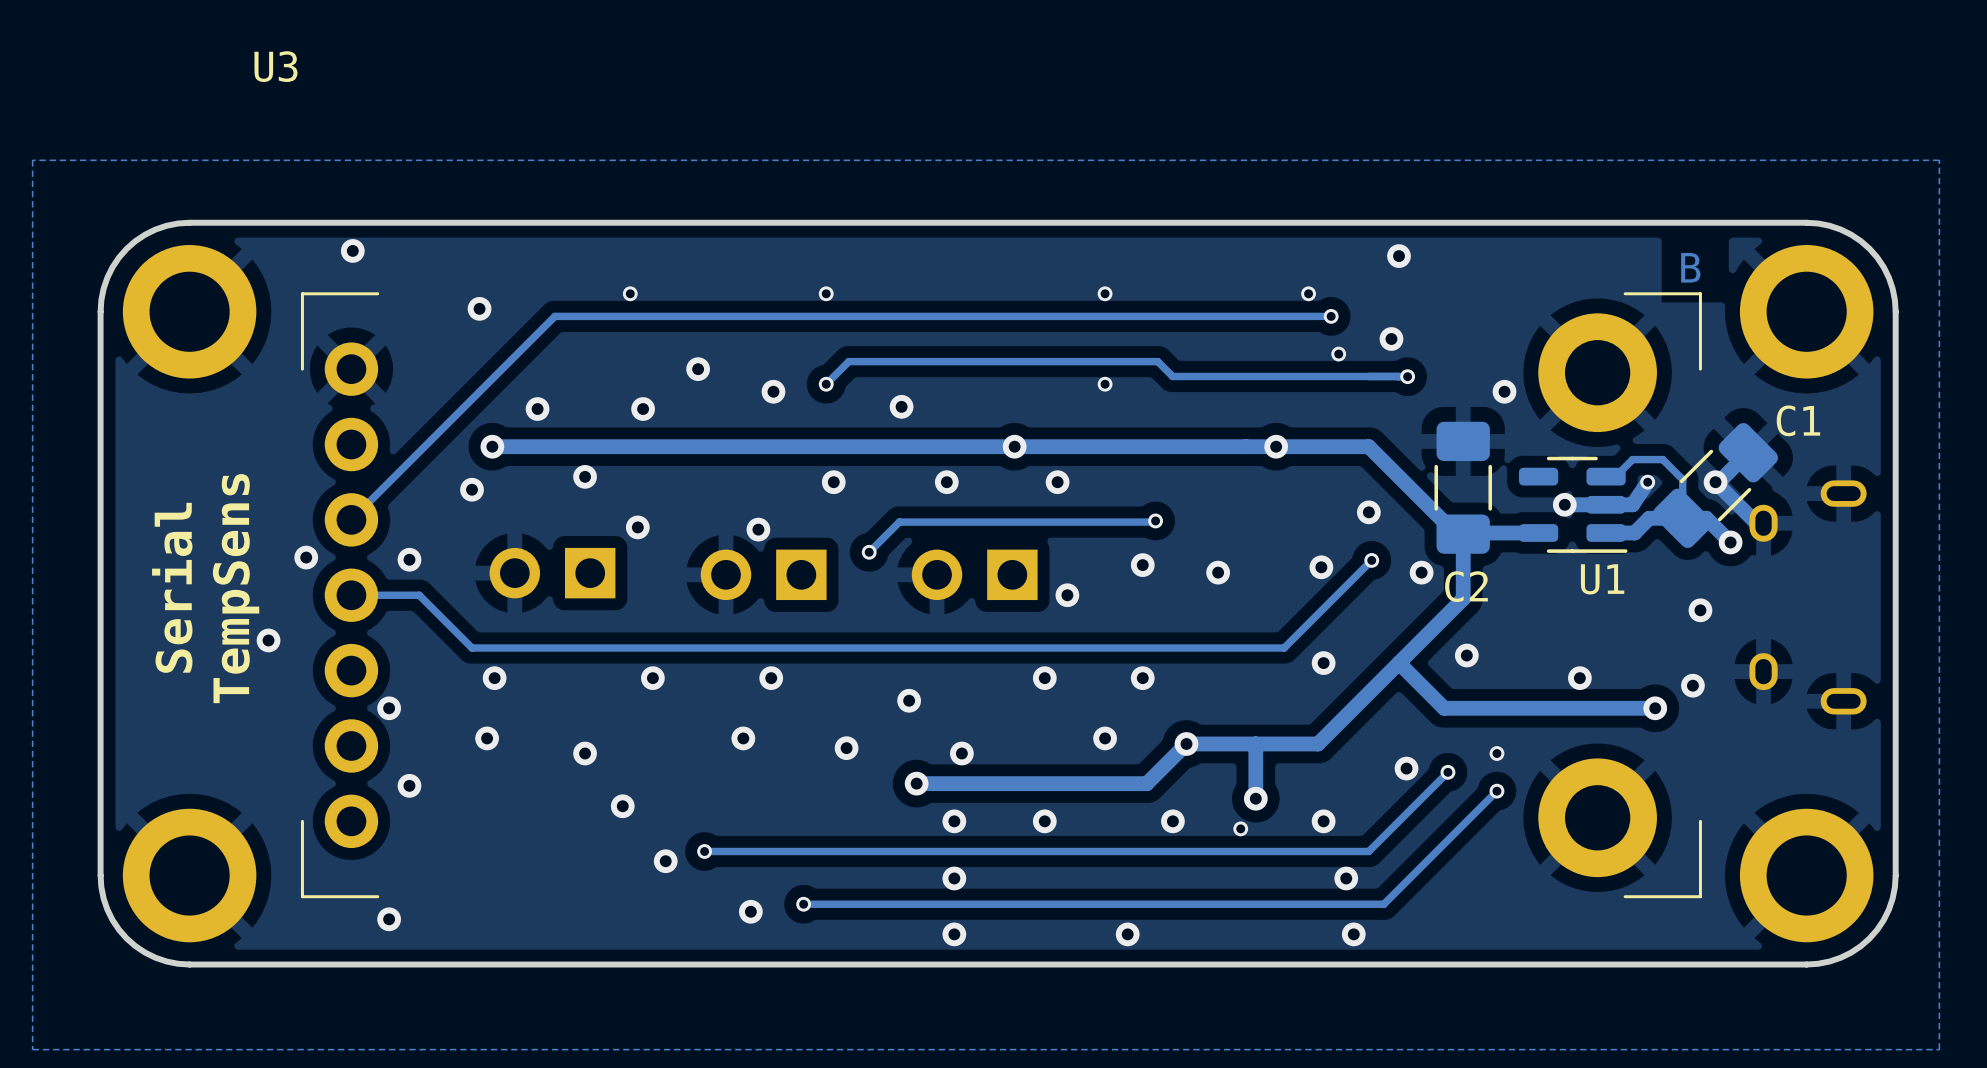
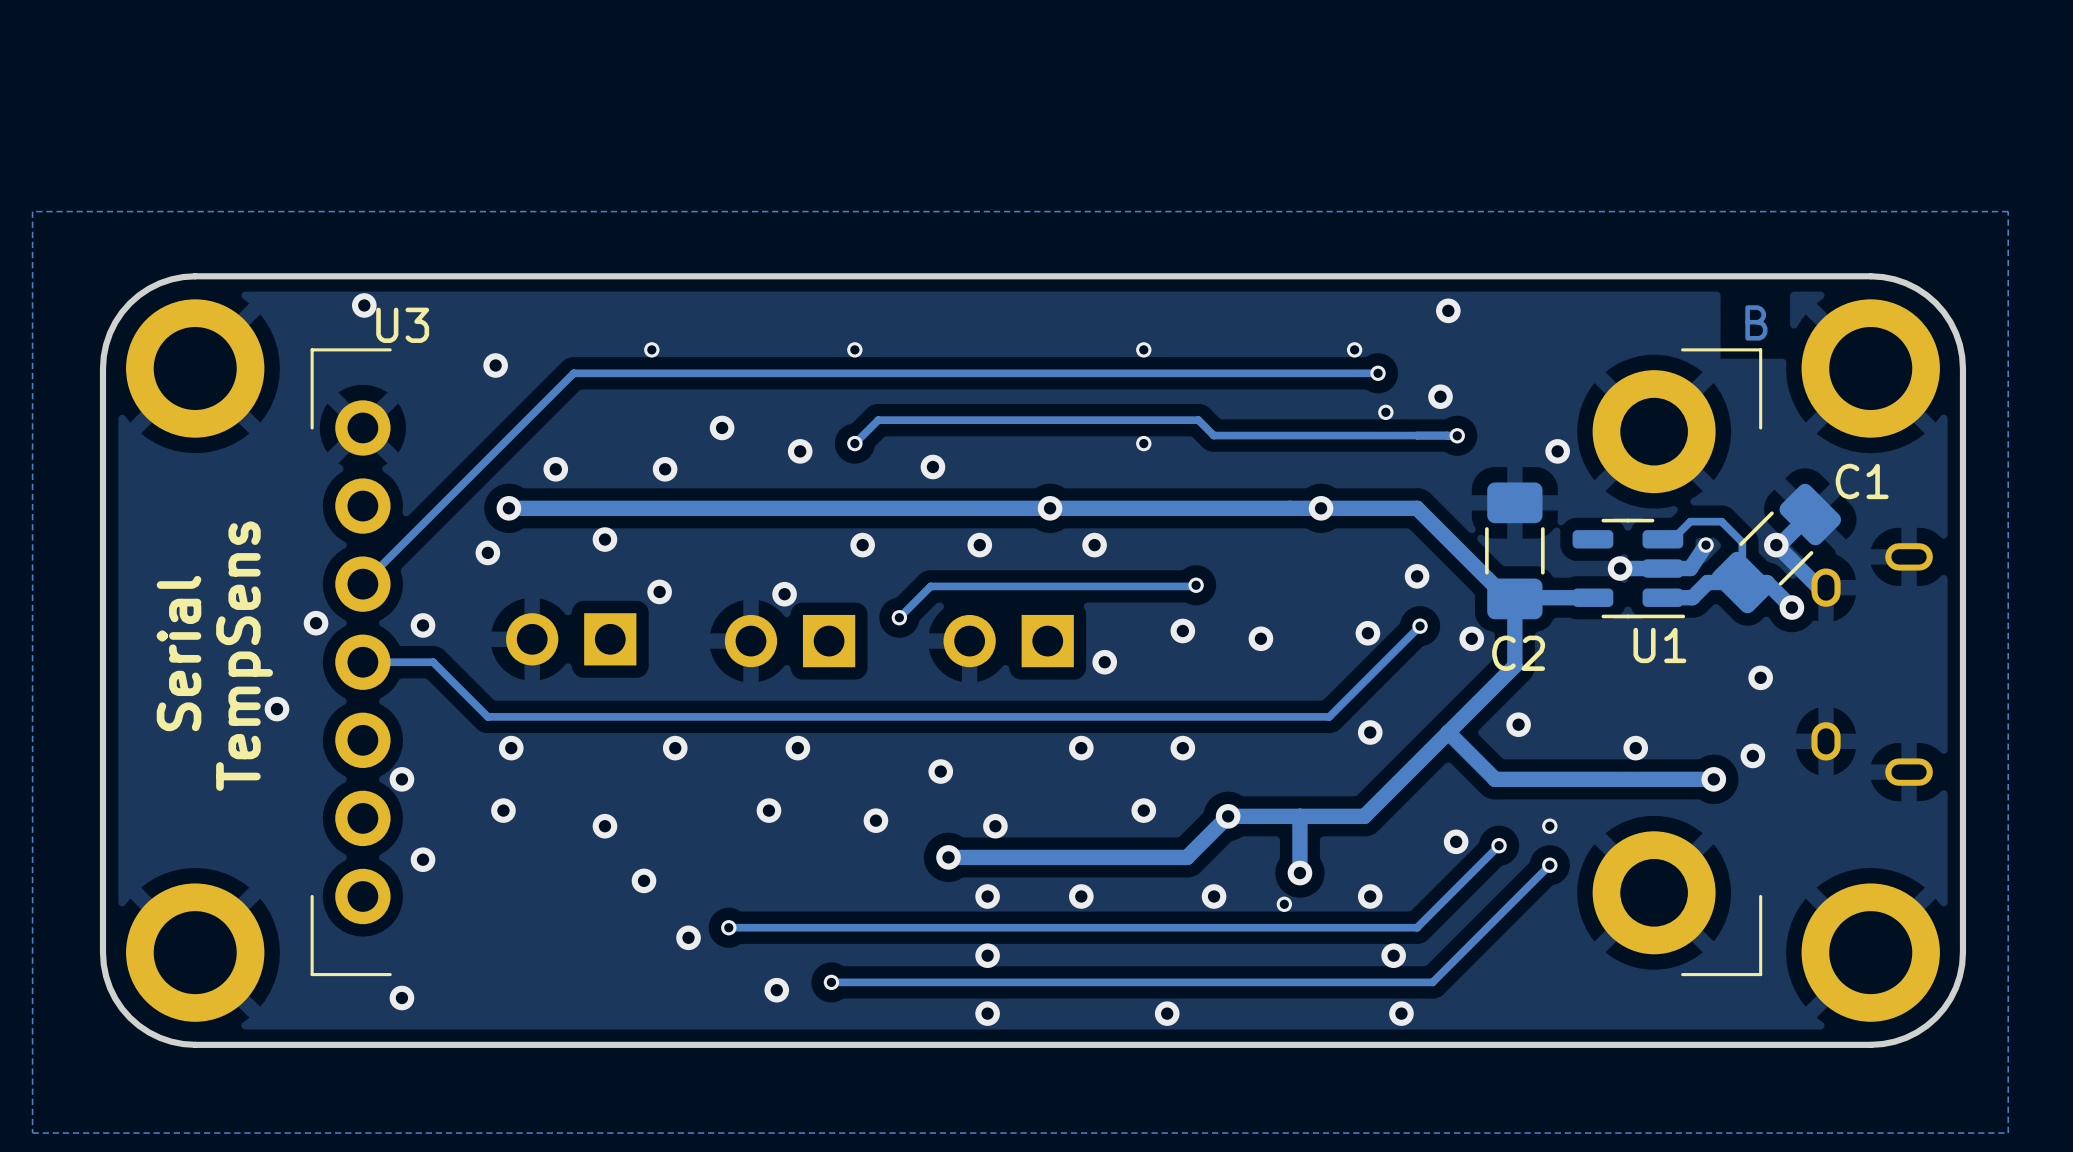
U3 name position: U3 (276, 66) -> U3 (402, 325)

